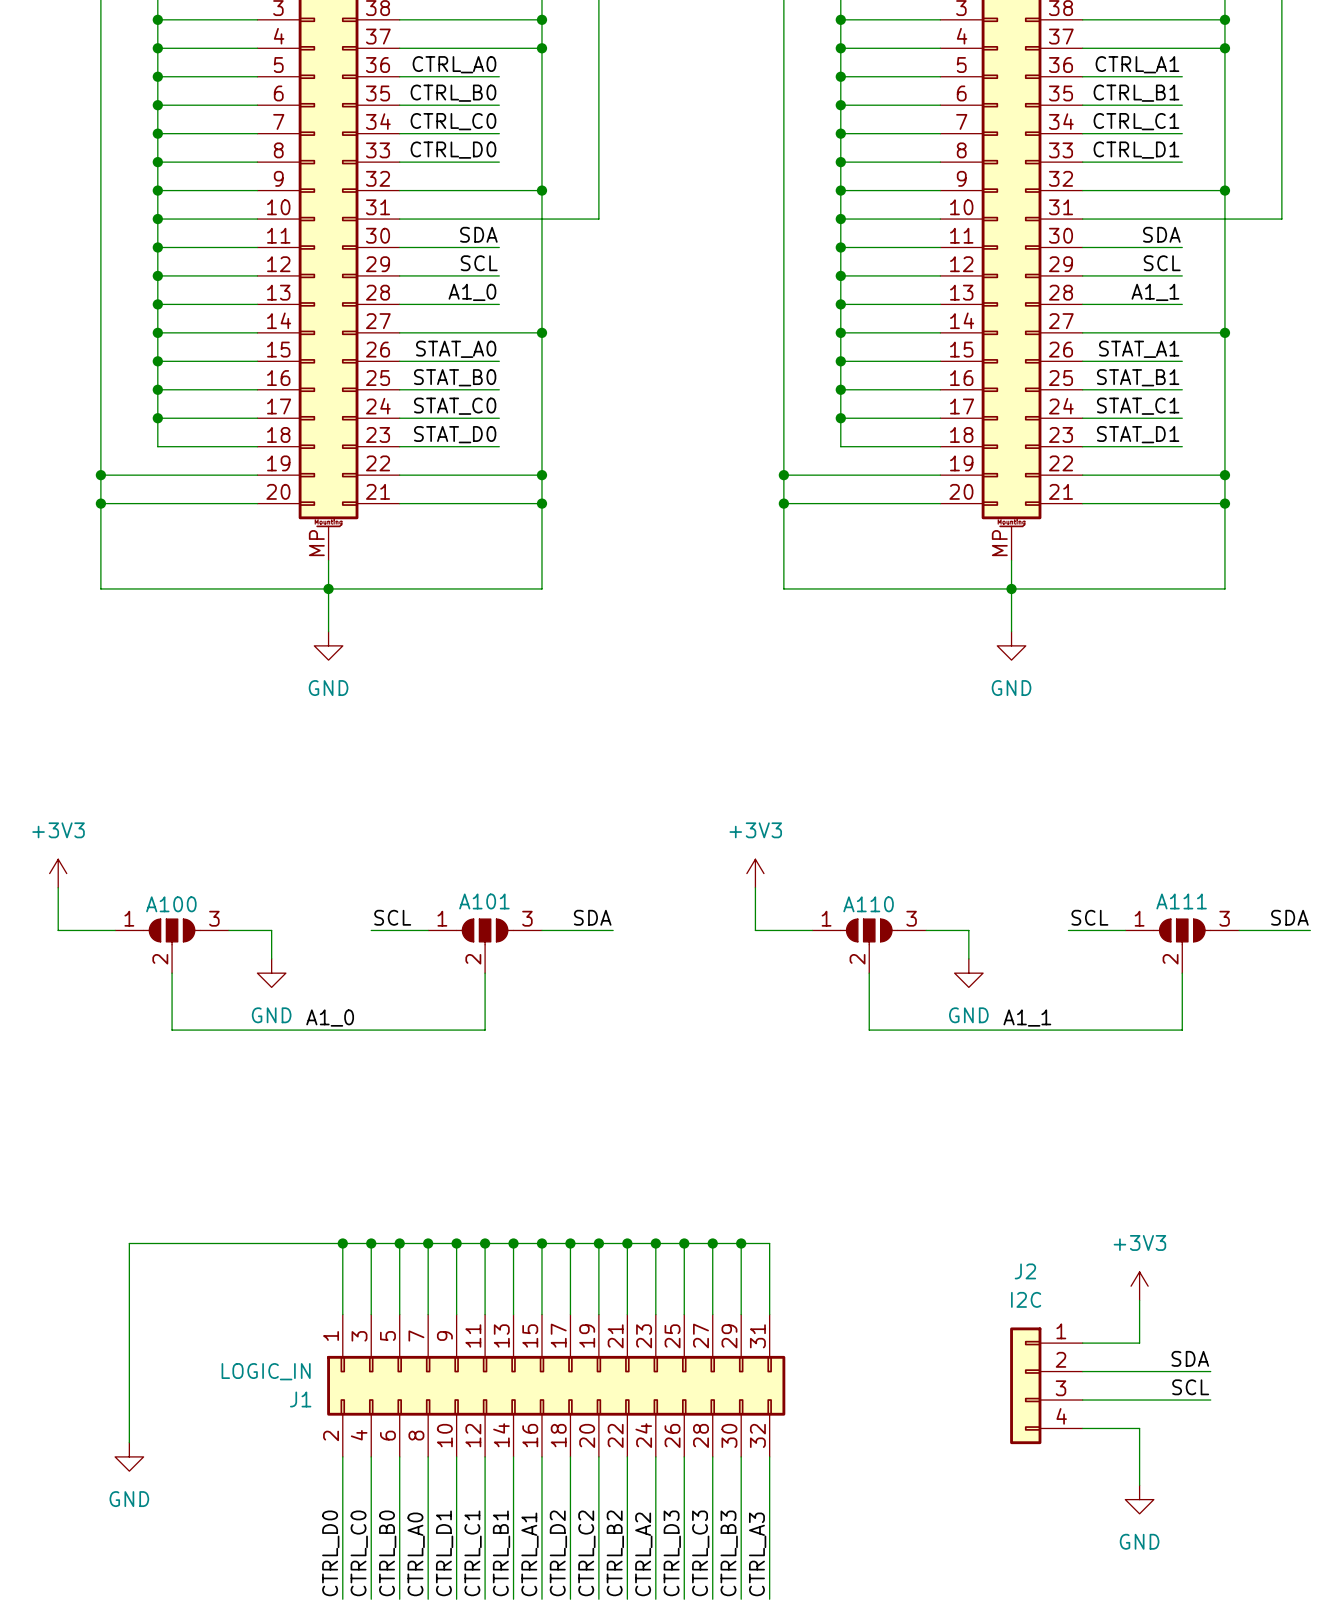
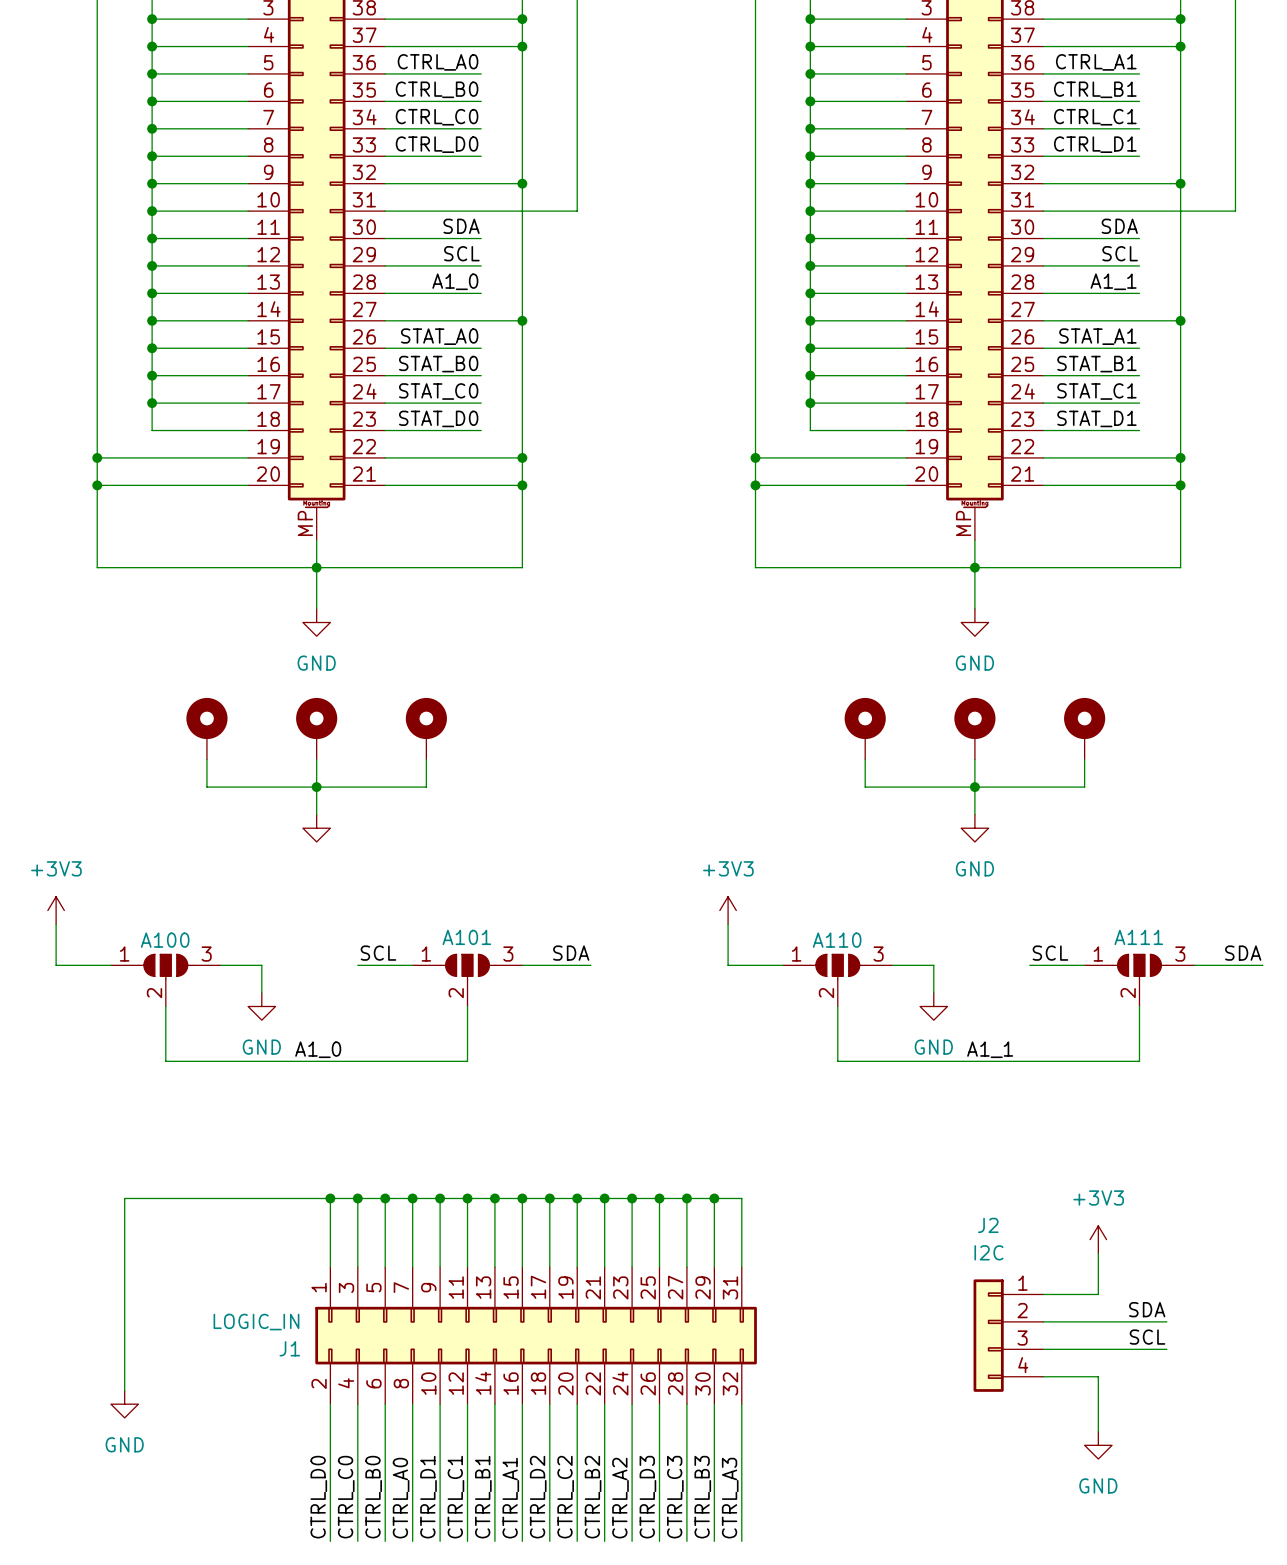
part: none -> (206, 728)
part: none -> (316, 728)
part: none -> (426, 728)
part: none -> (865, 728)
part: none -> (974, 728)
part: none -> (1084, 728)
wire: none -> (206, 759) (206, 787) (426, 787) (426, 759)
wire: none -> (316, 759) (316, 814)
wire: none -> (865, 759) (865, 787) (1084, 787) (1084, 759)
wire: none -> (974, 759) (974, 814)
junction: none -> (316, 787)
junction: none -> (974, 787)
power symbol: none -> (316, 828)
power symbol: none -> GND (974, 828)
power symbol position: +3V3 (58, 873) -> +3V3 (56, 910)
power symbol position: +3V3 (755, 873) -> +3V3 (728, 910)
wire: (58, 887) (58, 930) (115, 930) -> (56, 924) (56, 965) (110, 965)
wire: (755, 887) (755, 930) (812, 930) -> (728, 924) (728, 965) (782, 965)
label position: SCL (392, 917) -> SCL (378, 953)
label position: SDA (592, 917) -> SDA (571, 953)
label position: SCL (1089, 917) -> SCL (1050, 953)
label position: SDA (1289, 917) -> SDA (1243, 953)
wire: (228, 930) (271, 930) (271, 958) -> (220, 965) (261, 965) (261, 992)
wire: (371, 930) (428, 930) -> (357, 965) (412, 965)
wire: (541, 930) (613, 930) -> (522, 965) (590, 965)
wire: (926, 930) (968, 930) (968, 958) -> (892, 965) (933, 965) (933, 992)
wire: (1068, 930) (1125, 930) -> (1029, 965) (1084, 965)
wire: (1239, 930) (1310, 930) -> (1194, 965) (1262, 965)
A100 position: (172, 946) -> (165, 980)
A101 position: (485, 946) -> (467, 980)
A110 position: (869, 946) -> (837, 980)
A111 position: (1182, 946) -> (1139, 980)
wire: (172, 973) (172, 1030) (485, 1030) (485, 973) -> (165, 1006) (165, 1061) (467, 1061) (467, 1006)
power symbol position: GND (271, 973) -> GND (261, 1006)
wire: (869, 973) (869, 1030) (1182, 1030) (1182, 973) -> (837, 1006) (837, 1061) (1139, 1061) (1139, 1006)
power symbol: GND (968, 973) -> none
label position: A1_0 (330, 1018) -> A1_0 (318, 1049)
label position: A1_1 (1027, 1018) -> A1_1 (990, 1049)
power symbol: none -> GND (933, 1006)

